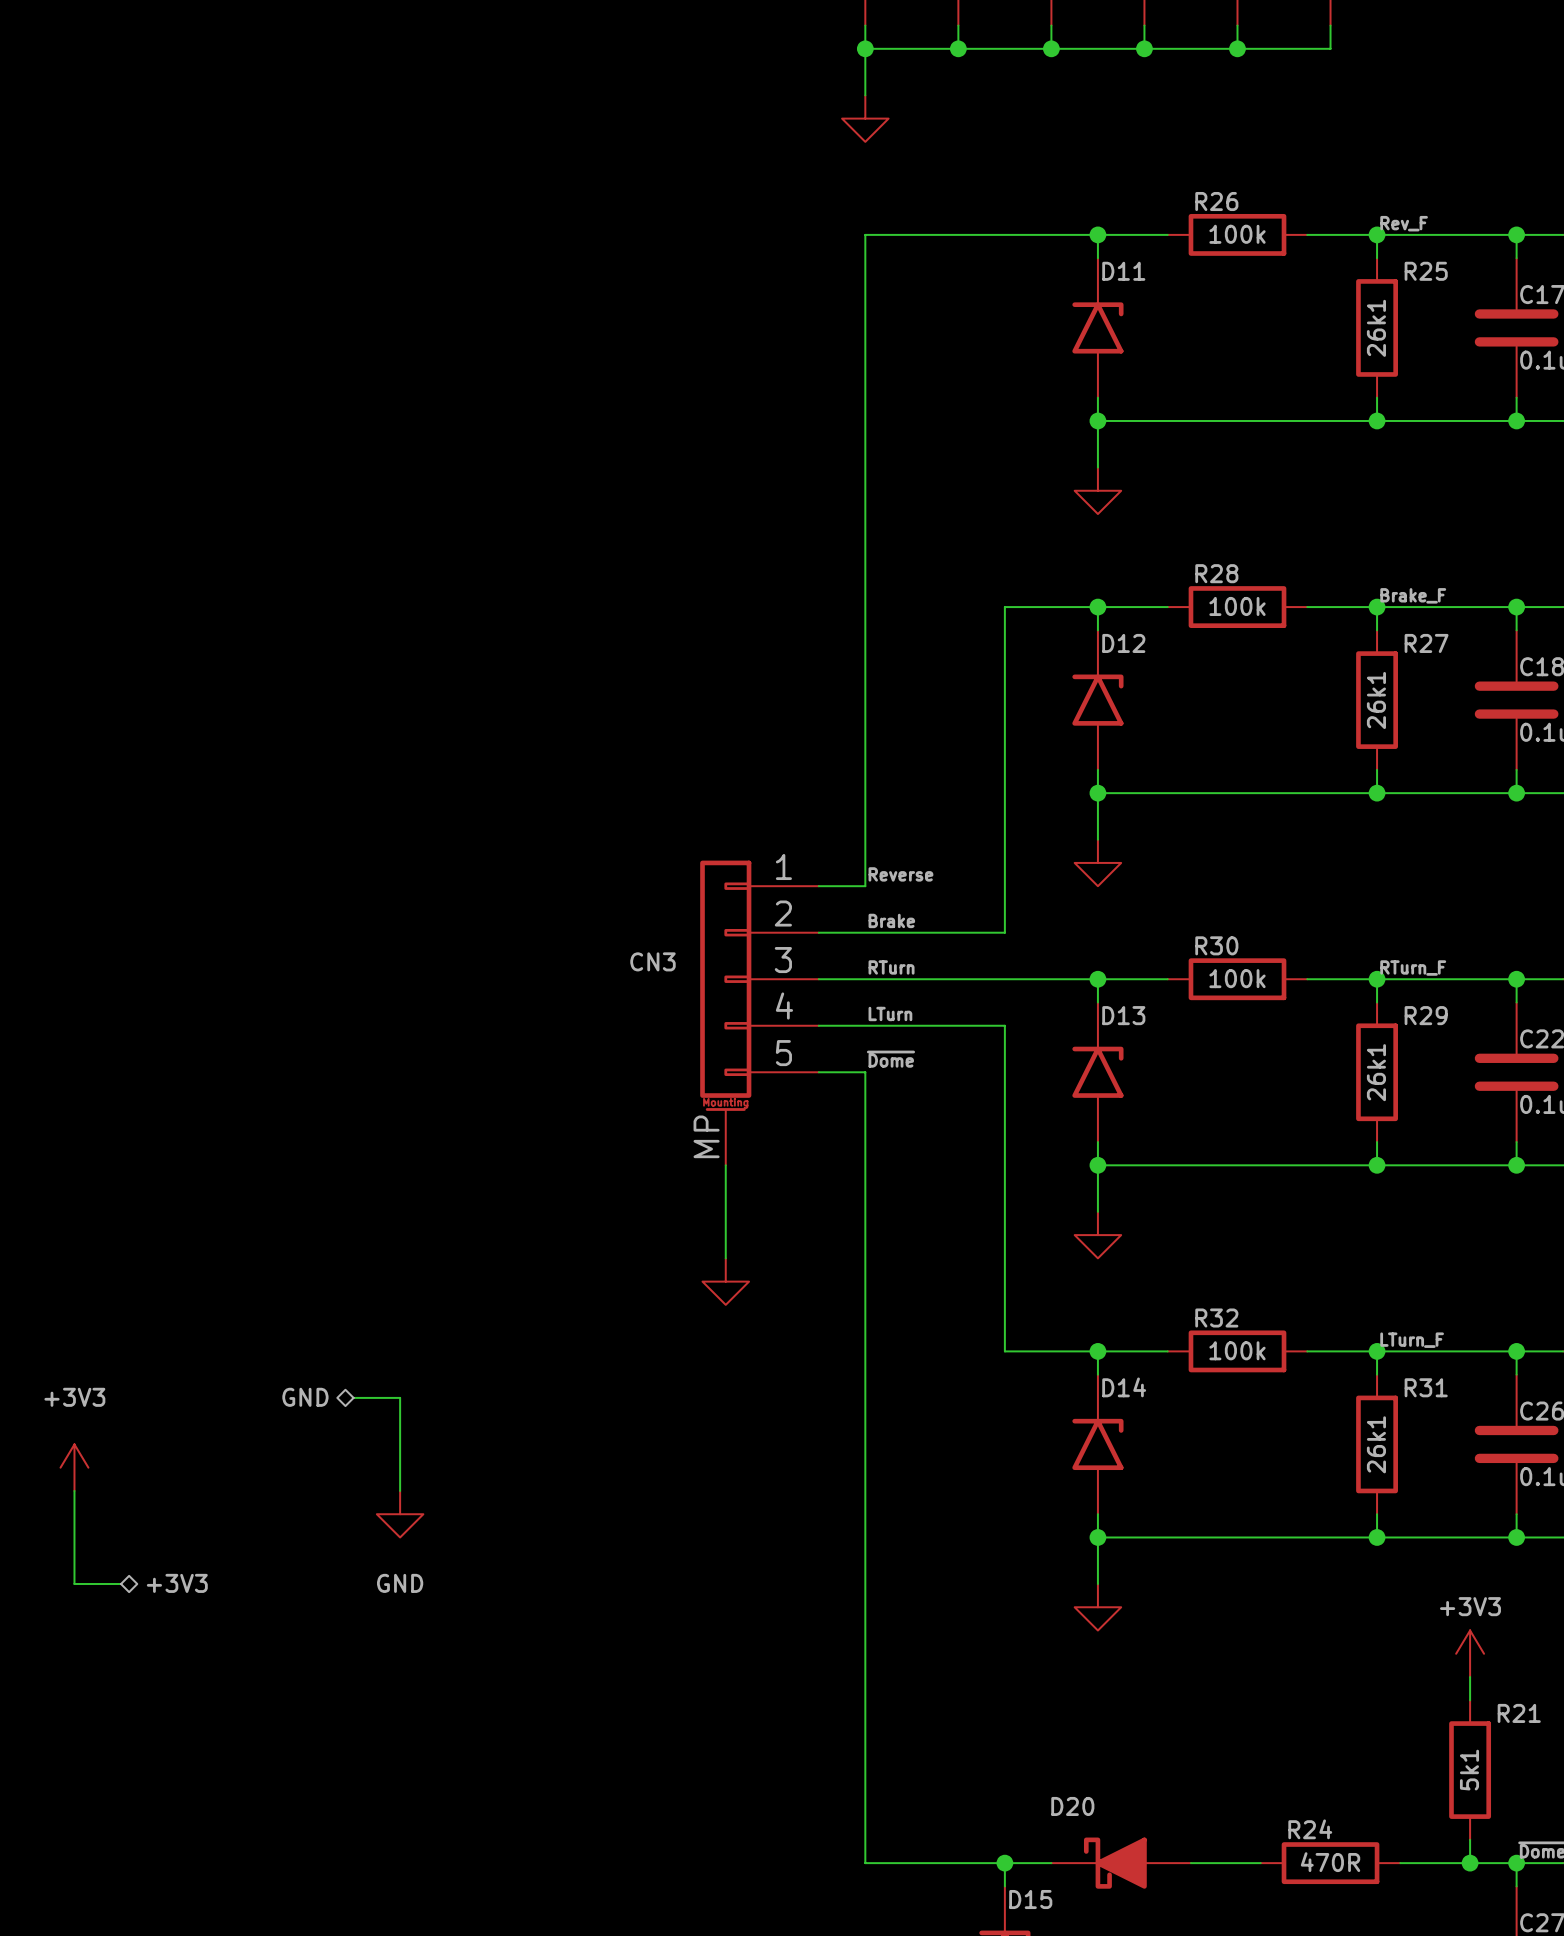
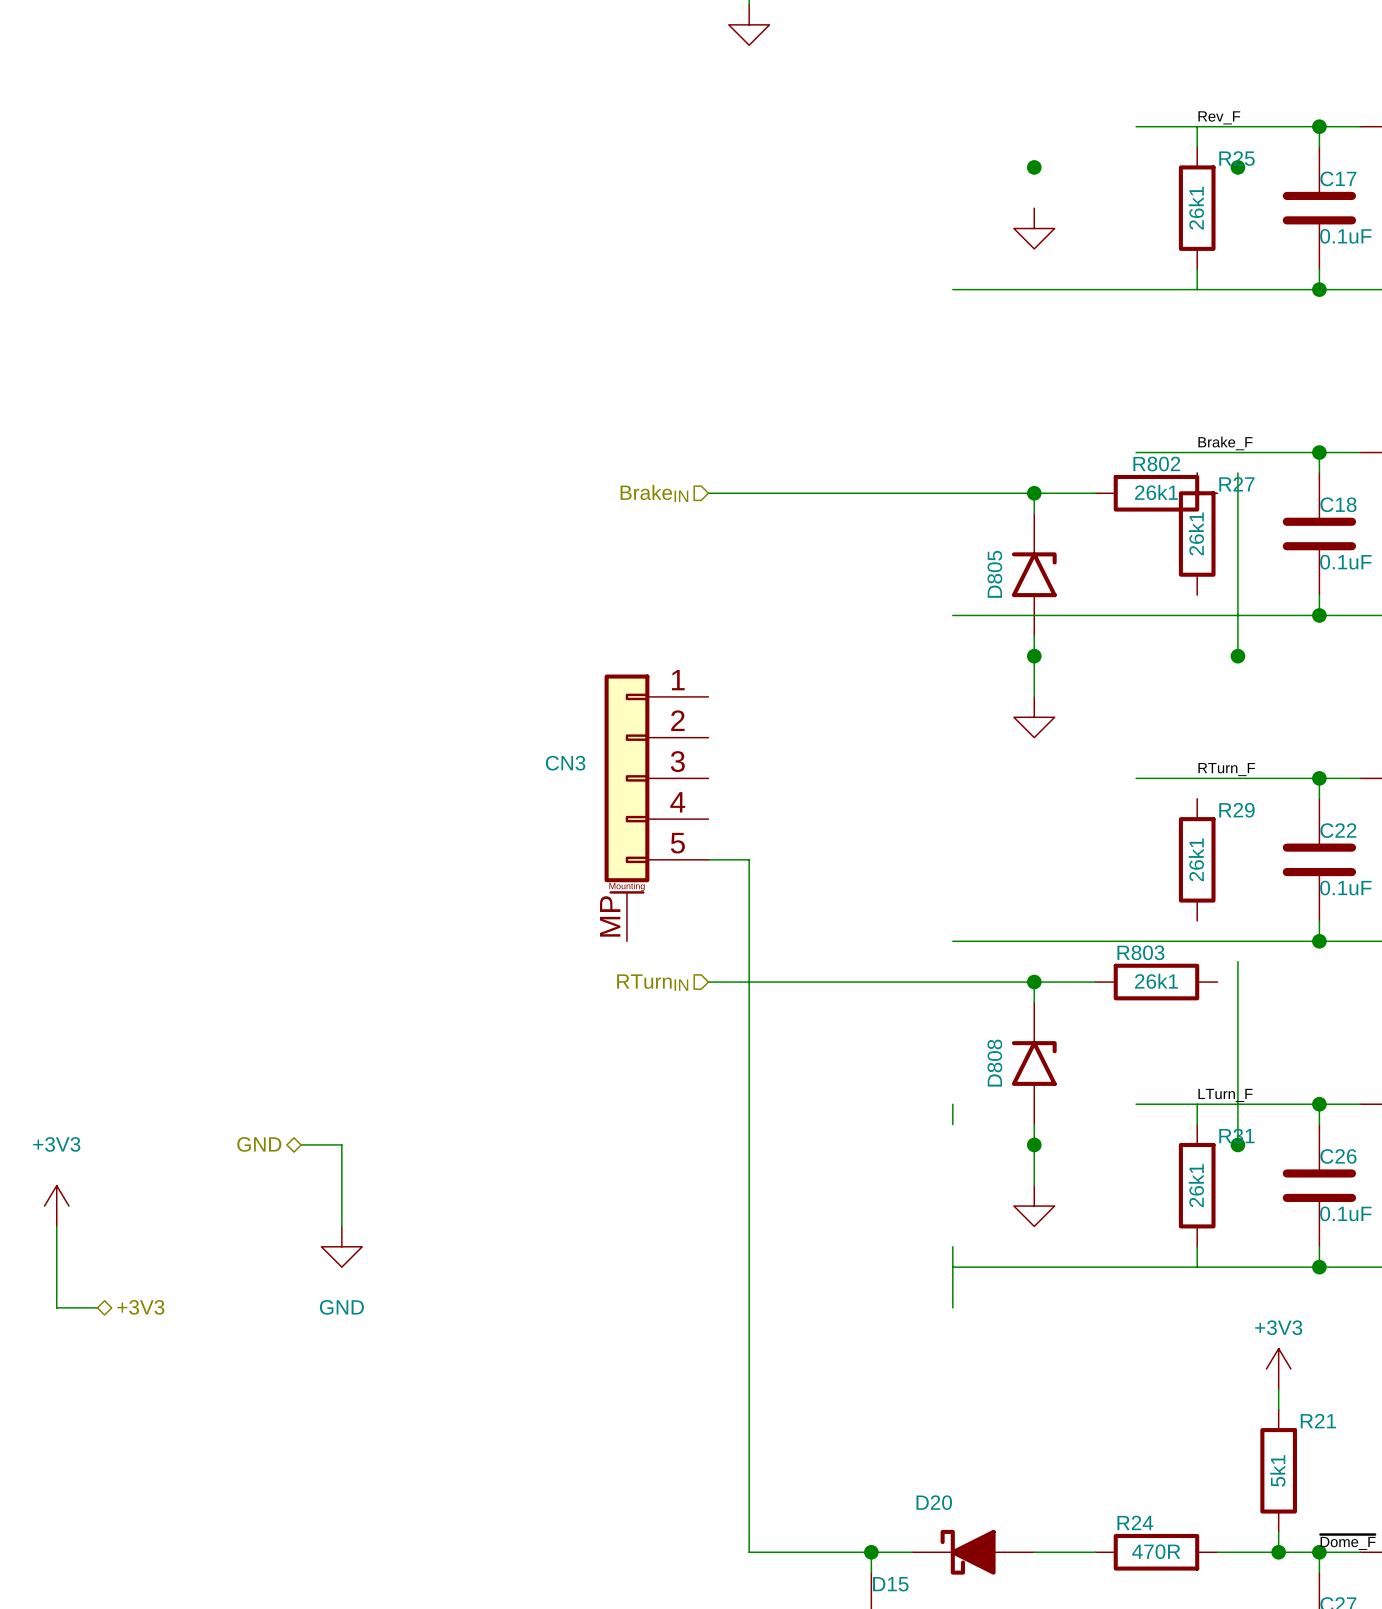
wire: (1097, 234) (1097, 258) -> none
junction: (1097, 234) -> none
wire: (1167, 234) (865, 234) (865, 886) (818, 886) -> none
R26: 100k (1237, 234) -> none
junction position: (1377, 234) -> (1237, 167)
junction: none -> (1034, 167)
D11: (1097, 327) -> none
wire: (1097, 397) (1097, 467) -> none
junction: (1097, 420) -> none
junction: (1377, 420) -> none
power symbol position: (1097, 490) -> (1034, 228)
wire: (1097, 607) (1097, 630) -> none
junction: (1097, 607) -> none
wire: (1167, 607) (1004, 607) (1004, 932) (818, 932) -> none
R28: 100k (1237, 607) -> none
wire: (1377, 607) (1377, 630) -> none
junction: (1377, 607) -> none
wire: none -> (1237, 472) (1237, 656)
wire: none -> (708, 493) (1095, 493)
junction: none -> (1034, 493)
R802: none -> 26k1 (1156, 493)
hierarchical label: none -> BrakeIN (654, 493)
D12: (1097, 700) -> none
D805: none -> (1034, 574)
wire: (1097, 769) (1097, 839) -> (1034, 635) (1034, 696)
wire: (1377, 769) (1377, 793) -> (1034, 493) (1034, 513)
junction: (1097, 793) -> none
junction position: (1377, 793) -> (1237, 656)
junction: none -> (1034, 656)
power symbol position: (1097, 862) -> (1034, 717)
label: Reverse (900, 874) -> none
label: Brake (891, 920) -> none
label: RTurn (891, 967) -> none
wire: (818, 979) (1167, 979) -> none
wire: (1097, 979) (1097, 1002) -> (1034, 982) (1034, 1002)
junction: (1097, 979) -> none
R30: 100k (1237, 979) -> none
wire: (1377, 979) (1377, 1002) -> none
junction: (1377, 979) -> none
label: LTurn (890, 1013) -> none
wire: (818, 1025) (1004, 1025) (1004, 1351) (1167, 1351) -> none
label: ~{Dome} (890, 1059) -> none
D13: (1097, 1072) -> none
wire: (1097, 1142) (1097, 1211) -> (1034, 1124) (1034, 1185)
wire: (1377, 1142) (1377, 1165) -> none
wire: (725, 1165) (725, 1258) -> none
junction: (1097, 1165) -> none
junction: (1377, 1165) -> none
wire: none -> (1237, 961) (1237, 1144)
wire: none -> (708, 982) (1095, 982)
junction: none -> (1034, 982)
R803: none -> 26k1 (1156, 982)
hierarchical label: none -> RTurnIN (652, 982)
power symbol: (1097, 1235) -> none
power symbol: (725, 1281) -> none
D808: none -> (1034, 1063)
junction: (1097, 1351) -> none
R32: 100k (1237, 1351) -> none
junction position: (1377, 1351) -> (1237, 1144)
junction: none -> (1034, 1144)
D14: (1097, 1444) -> none
power symbol: none -> (1034, 1206)
junction: (1097, 1537) -> none
junction: (1377, 1537) -> none
power symbol: (1097, 1607) -> none

